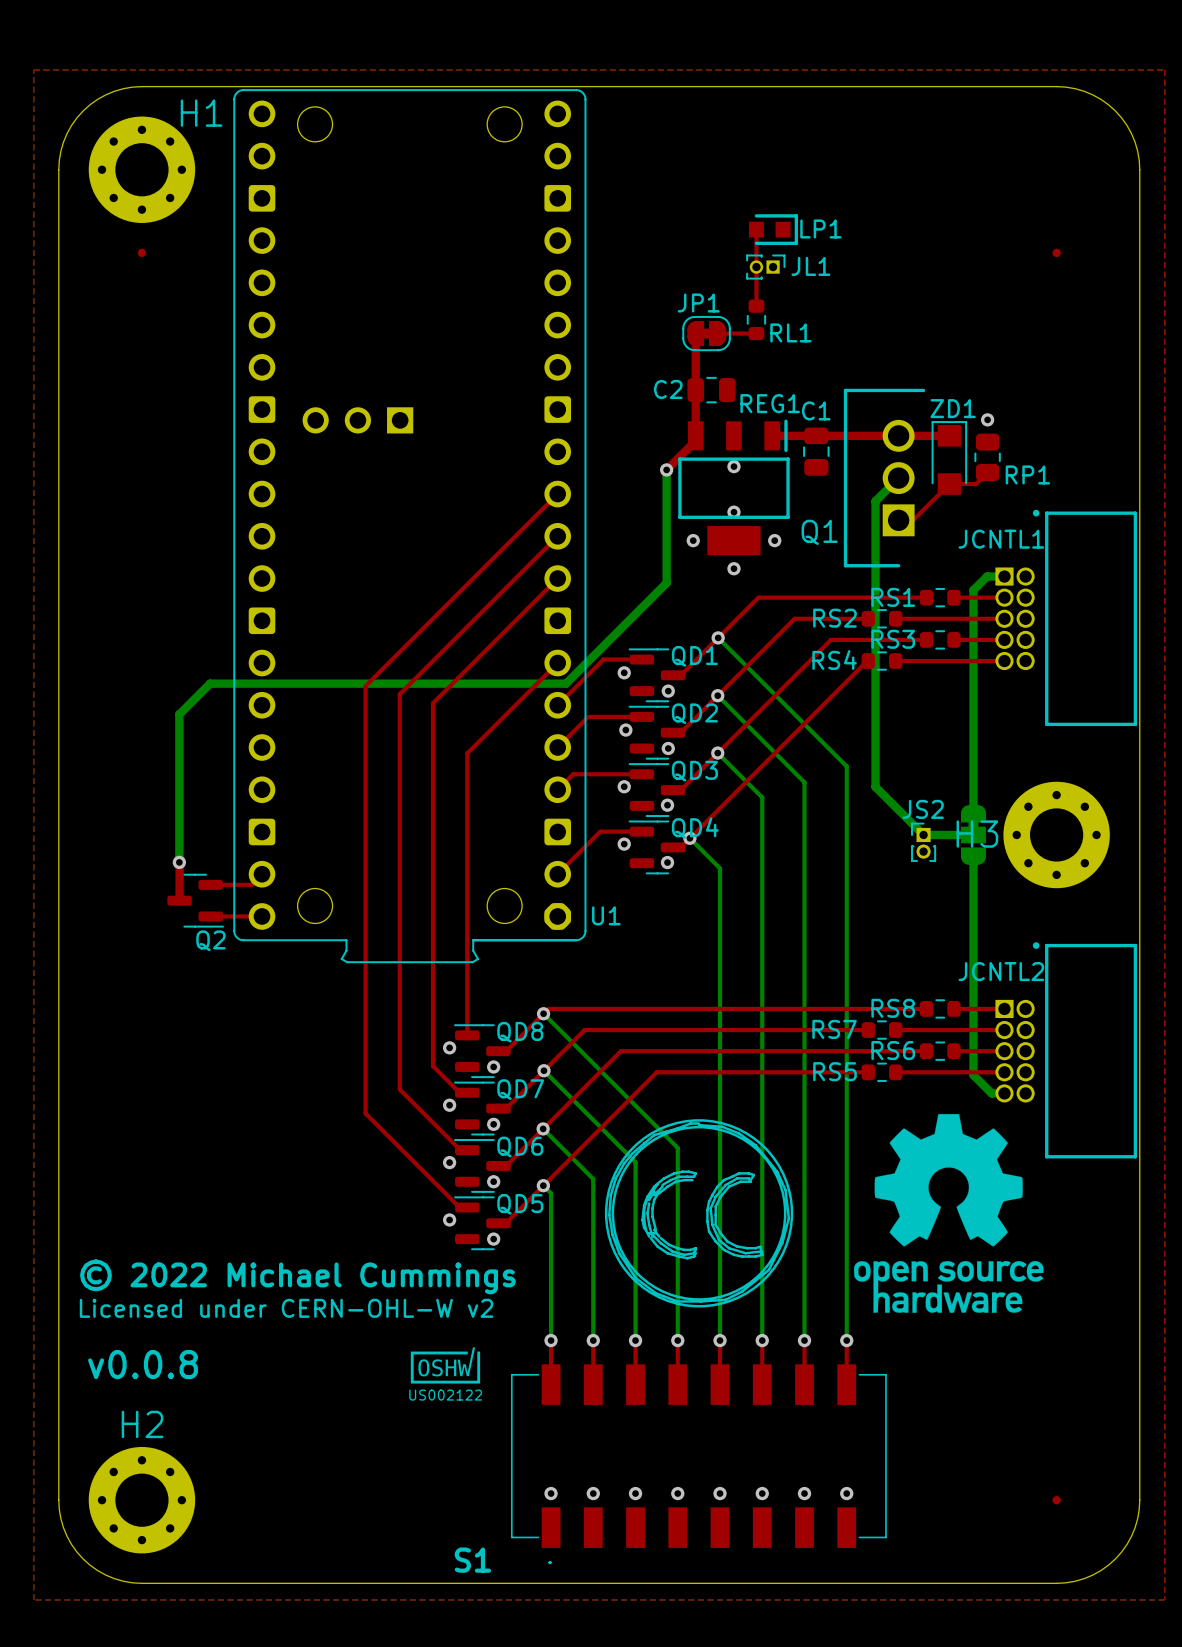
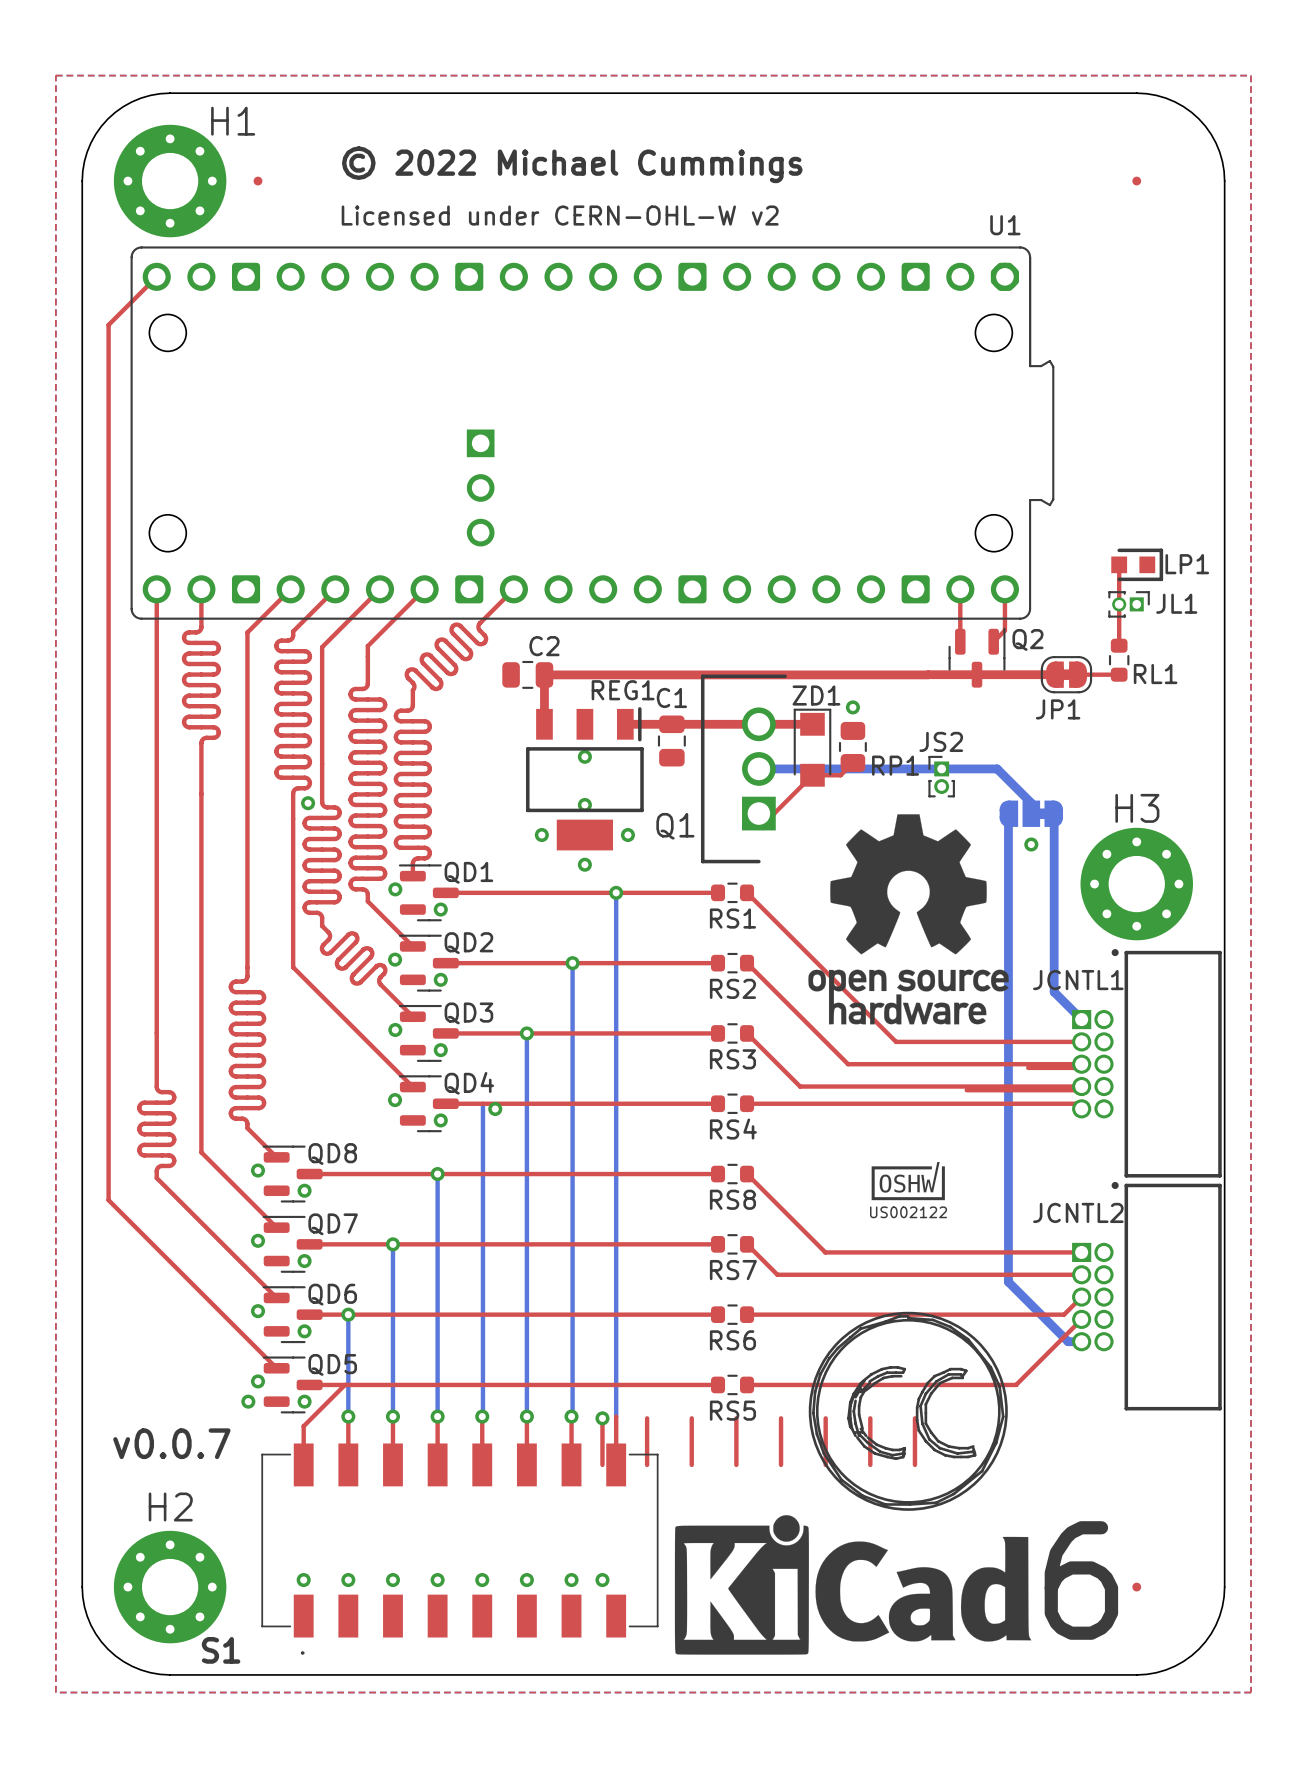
text: none -> © 2022 Michael Cummings (572, 164)
text: none -> Licensed under CERN-OHL-W v2 (560, 215)
top track: (756, 229) (756, 306) -> (1119, 564) (1119, 645)
LP1 position: (773, 229) -> (1137, 564)
part position: (141, 252) -> (257, 181)
part position: (1056, 252) -> (1136, 181)
top track: none -> (156, 276) (108, 324) (108, 1200) (276, 1368)
JL1 position: (765, 267) -> (1129, 604)
JP1 name position: JP1 (698, 303) -> JP1 (1058, 709)
RL1 position: (756, 319) -> (1119, 660)
top track: (695, 333) (695, 435) -> none
JP1 position: (706, 333) -> (1066, 674)
top track: (717, 333) (756, 333) -> (1077, 674) (1119, 674)
C2 name position: C2 (668, 389) -> C2 (544, 646)
C2 position: (711, 390) -> (527, 674)
via: (987, 419) -> none
top track: (772, 435) (949, 435) -> (625, 724) (812, 724)
top track: (695, 440) (666, 469) -> none
C1 position: (816, 451) -> (671, 740)
ZD1 position: (949, 457) -> (812, 747)
RP1 position: (987, 457) -> (852, 746)
via: (733, 466) -> none
bottom track: (666, 469) (666, 583) (566, 683) (210, 683) (179, 714) (179, 862) -> none
via: (666, 469) -> none
top track: (987, 472) (976, 484) (949, 484) (913, 520) (898, 520) -> (852, 763) (840, 775) (812, 775) (774, 813) (758, 813)
Q1 position: (884, 478) -> (743, 768)
bottom track: (898, 478) (875, 501) (875, 786) (923, 834) (973, 834) -> none
REG1 position: (733, 487) -> (584, 778)
top track: (557, 494) (365, 686) (365, 1113) (459, 1207) -> none
via: (733, 512) -> none
U1 rotation: 0° (409, 526) -> 90° counterclockwise (592, 433)
top track: (557, 536) (399, 694) (399, 1089) (460, 1150) -> none
via: (693, 540) -> none
via: (774, 540) -> none
top track: none -> (156, 589) (156, 1086) (159, 1091) (170, 1092) (174, 1097) (169, 1102) (143, 1102) (139, 1107) (143, 1113) (169, 1113) (174, 1118) (169, 1123) (143, 1123) (139, 1129) (143, 1134) (170, 1134) (174, 1139) (169, 1144) (143, 1145) (139, 1150) (143, 1155) (172, 1156) (174, 1160) (172, 1164) (157, 1168) (156, 1178) (276, 1297)
top track: none -> (201, 589) (201, 629) (197, 632) (186, 633) (184, 637) (188, 642) (214, 643) (218, 648) (214, 653) (188, 653) (184, 658) (188, 663) (214, 664) (218, 669) (214, 674) (188, 674) (184, 679) (187, 684) (214, 685) (218, 690) (214, 695) (187, 695) (184, 700) (188, 706) (214, 706) (218, 711) (214, 716) (187, 716) (184, 722) (187, 727) (214, 727) (218, 732) (216, 737) (204, 738) (201, 743) (201, 1152) (276, 1227)
top track: none -> (290, 589) (247, 632) (247, 976) (244, 980) (234, 982) (230, 986) (234, 991) (259, 992) (264, 997) (260, 1002) (235, 1002) (231, 1006) (234, 1012) (259, 1013) (264, 1018) (260, 1023) (235, 1023) (231, 1027) (231, 1031) (234, 1033) (259, 1034) (264, 1039) (260, 1044) (235, 1044) (231, 1047) (231, 1051) (234, 1055) (259, 1055) (264, 1060) (259, 1065) (234, 1066) (230, 1070) (232, 1074) (260, 1076) (264, 1081) (259, 1087) (234, 1087) (231, 1090) (231, 1094) (235, 1097) (260, 1097) (264, 1102) (259, 1108) (234, 1108) (231, 1114) (234, 1118) (245, 1120) (247, 1128) (276, 1157)
top track: none -> (335, 589) (293, 631) (291, 639) (279, 641) (276, 645) (280, 651) (305, 651) (309, 656) (306, 661) (280, 661) (276, 667) (280, 672) (306, 672) (309, 677) (306, 682) (280, 682) (276, 688) (280, 693) (305, 693) (309, 698) (306, 703) (280, 703) (276, 709) (280, 714) (306, 714) (309, 719) (306, 724) (280, 725) (276, 729) (280, 735) (305, 735) (309, 740) (306, 745) (280, 746) (276, 750) (280, 756) (305, 756) (309, 761) (306, 767) (280, 767) (276, 771) (280, 777) (305, 777) (309, 782) (307, 787) (296, 788) (293, 792) (293, 967) (412, 1087)
top track: none -> (379, 589) (322, 647) (322, 802) (325, 806) (337, 808) (339, 813) (335, 817) (308, 818) (304, 823) (309, 828) (335, 828) (339, 834) (335, 838) (308, 839) (304, 844) (309, 849) (335, 849) (339, 855) (335, 860) (308, 860) (304, 866) (309, 870) (335, 870) (339, 876) (335, 881) (308, 881) (304, 887) (309, 891) (335, 891) (339, 897) (335, 902) (308, 902) (304, 908) (307, 912) (320, 914) (322, 926) (329, 933) (329, 938) (322, 947) (323, 952) (330, 952) (348, 934) (355, 934) (356, 940) (337, 960) (337, 966) (344, 967) (363, 949) (369, 949) (371, 955) (352, 975) (352, 980) (359, 983) (376, 966) (382, 965) (385, 970) (379, 978) (379, 983) (412, 1016)
top track: none -> (424, 589) (367, 646) (367, 685) (363, 688) (353, 689) (350, 694) (355, 699) (381, 699) (385, 704) (381, 709) (355, 710) (350, 714) (354, 720) (380, 720) (385, 725) (381, 730) (355, 731) (350, 735) (353, 741) (380, 741) (385, 746) (381, 752) (355, 752) (350, 756) (353, 762) (380, 762) (385, 768) (381, 773) (355, 773) (350, 777) (353, 783) (380, 783) (385, 789) (381, 794) (355, 794) (350, 797) (350, 801) (353, 804) (380, 805) (385, 810) (381, 815) (352, 817) (350, 821) (353, 825) (380, 826) (385, 831) (380, 836) (353, 837) (350, 840) (351, 844) (355, 847) (381, 847) (385, 852) (380, 857) (353, 858) (350, 860) (350, 864) (355, 868) (381, 868) (385, 873) (380, 878) (353, 879) (350, 885) (353, 888) (366, 890) (367, 901) (412, 946)
top track: none -> (513, 589) (479, 624) (478, 629) (485, 637) (483, 643) (477, 643) (459, 625) (452, 627) (452, 633) (470, 651) (468, 658) (462, 657) (444, 640) (437, 641) (437, 648) (455, 666) (454, 672) (447, 672) (429, 654) (422, 656) (422, 662) (440, 681) (439, 687) (432, 687) (414, 669) (410, 669) (407, 672) (407, 677) (414, 686) (412, 706) (408, 710) (397, 711) (396, 718) (400, 721) (425, 721) (429, 726) (425, 731) (400, 731) (395, 736) (399, 742) (425, 742) (429, 746) (425, 752) (400, 752) (395, 757) (399, 763) (425, 763) (429, 768) (425, 773) (400, 774) (395, 778) (399, 784) (425, 784) (429, 789) (425, 794) (400, 795) (395, 799) (399, 805) (425, 805) (429, 809) (429, 813) (425, 815) (400, 816) (396, 820) (396, 824) (399, 826) (425, 826) (429, 830) (429, 834) (425, 837) (400, 837) (396, 840) (396, 844) (399, 847) (425, 847) (429, 851) (427, 857) (416, 858) (413, 860) (412, 876)
top track: none -> (960, 589) (960, 641)
top track: none -> (1004, 589) (1004, 630) (993, 641)
via: (733, 568) -> none
bottom track: (1004, 576) (987, 576) (973, 590) (973, 813) -> none
top track: (557, 578) (432, 703) (432, 1066) (459, 1092) -> none
RS1 name position: RS1 (893, 597) -> RS1 (732, 918)
top track: (926, 597) (758, 597) (680, 675) -> none
RS1 position: (940, 597) -> (732, 892)
top track: (953, 597) (1004, 597) -> none
JCNTL1 position: (1066, 617) -> (1146, 1063)
RS2 name position: RS2 (835, 618) -> RS2 (732, 988)
top track: (868, 618) (794, 618) (680, 732) -> none
RS2 position: (882, 618) -> (732, 963)
top track: (895, 618) (1004, 618) -> none
top track: none -> (928, 674) (1055, 674)
bottom track: (718, 637) (846, 766) (846, 1340) -> none
via: (718, 637) -> none
top track: none -> (928, 674) (544, 674) (544, 724)
RS3 name position: RS3 (893, 639) -> RS3 (732, 1059)
top track: (926, 639) (830, 639) (680, 790) -> none
RS3 position: (940, 639) -> (732, 1033)
top track: (953, 639) (1004, 639) -> none
top track: (641, 659) (603, 659) (557, 705) -> none
RS4 name position: RS4 (834, 660) -> RS4 (733, 1129)
top track: (867, 661) (680, 847) -> none
RS4 position: (882, 661) -> (732, 1103)
top track: (895, 661) (1004, 661) -> none
top track: (557, 663) (467, 753) (467, 1035) -> none
via: none -> (852, 707)
via: (624, 672) -> none
QD1 position: (656, 675) -> (428, 892)
via: (668, 691) -> none
bottom track: (717, 695) (804, 782) (804, 1340) -> none
via: (717, 695) -> none
via: none -> (584, 756)
top track: (641, 716) (588, 716) (557, 747) -> none
bottom track: none -> (758, 768) (997, 768) (1031, 803) (1031, 813)
via: (625, 730) -> none
QD2 position: (656, 732) -> (428, 963)
via: (668, 748) -> none
bottom track: (717, 753) (762, 797) (762, 1340) -> none
via: (717, 753) -> none
via: none -> (308, 803)
via: none -> (584, 804)
bottom track: none -> (1008, 813) (1008, 1282) (1068, 1341) (1081, 1341)
bottom track: none -> (1054, 813) (1054, 992) (1081, 1019)
top track: (641, 774) (573, 774) (557, 789) -> none
via: (624, 786) -> none
via: none -> (541, 835)
via: none -> (627, 835)
QD3 position: (656, 790) -> (428, 1033)
via: none -> (1031, 844)
via: (667, 805) -> none
via: none -> (584, 864)
top track: (641, 831) (600, 831) (557, 874) -> none
part rotation: 0° (973, 834) -> 90° clockwise (1031, 813)
part position: (973, 834) -> (1031, 813)
H3 name position: H3 (977, 834) -> H3 (1137, 808)
bottom track: (689, 838) (720, 868) (720, 1340) -> none
via: (689, 838) -> none
via: none -> (395, 889)
JS2 position: (923, 842) -> (941, 776)
top track: none -> (445, 892) (718, 892)
bottom track: none -> (616, 892) (616, 1416)
via: none -> (616, 892)
top track: none -> (747, 892) (896, 1041) (1081, 1041)
via: (624, 844) -> none
QD4 position: (656, 847) -> (428, 1103)
bottom track: (973, 856) (973, 1075) (991, 1093) (1004, 1093) -> none
via: none -> (440, 909)
top track: (179, 862) (179, 900) -> none
via: (179, 862) -> none
via: (667, 862) -> none
top track: (262, 874) (251, 884) (210, 884) -> none
Q2 rotation: 0° (195, 900) -> 90° counterclockwise (977, 657)
Q2 position: (195, 900) -> (977, 657)
via: none -> (395, 959)
top track: none -> (445, 963) (718, 963)
bottom track: none -> (572, 963) (571, 1416)
via: none -> (572, 963)
top track: none -> (747, 963) (848, 1064) (1081, 1064)
top track: (210, 916) (262, 916) -> none
via: none -> (440, 979)
via: none -> (395, 1029)
top track: none -> (445, 1033) (718, 1033)
bottom track: none -> (526, 1033) (526, 1416)
via: none -> (526, 1033)
top track: none -> (747, 1033) (800, 1086) (1081, 1086)
via: none -> (440, 1050)
RS8 name position: RS8 (893, 1008) -> RS8 (732, 1199)
top track: (926, 1008) (548, 1008) (506, 1051) -> none
RS8 position: (940, 1008) -> (732, 1174)
bottom track: (543, 1013) (677, 1147) (677, 1340) -> none
via: (543, 1013) -> none
RS7 name position: RS7 (834, 1029) -> RS7 (733, 1270)
top track: (868, 1030) (584, 1030) (506, 1108) -> none
RS7 position: (882, 1030) -> (732, 1244)
via: none -> (395, 1100)
top track: none -> (445, 1103) (718, 1103)
bottom track: none -> (482, 1103) (482, 1416)
top track: none -> (747, 1103) (1076, 1103) (1081, 1108)
RS6 name position: RS6 (893, 1050) -> RS6 (732, 1340)
JCNTL2 position: (1066, 1050) -> (1146, 1296)
QD8 position: (482, 1051) -> (292, 1174)
top track: (926, 1051) (620, 1051) (506, 1165) -> none
RS6 position: (940, 1051) -> (732, 1314)
top track: (953, 1051) (1004, 1051) -> none
via: none -> (440, 1120)
via: (493, 1066) -> none
bottom track: (543, 1070) (635, 1162) (635, 1340) -> none
via: (543, 1070) -> none
RS5 name position: RS5 (835, 1071) -> RS5 (732, 1410)
top track: (868, 1072) (656, 1072) (505, 1223) -> none
RS5 position: (882, 1072) -> (732, 1384)
top track: (895, 1072) (1004, 1072) -> none
drawing: none -> [871, 1162, 945, 1201]
via: (449, 1105) -> none
via: none -> (257, 1170)
QD7 position: (482, 1108) -> (292, 1244)
top track: none -> (309, 1174) (718, 1174)
bottom track: none -> (437, 1174) (437, 1416)
via: none -> (437, 1174)
top track: none -> (747, 1174) (825, 1252) (1081, 1252)
via: (493, 1124) -> none
via: none -> (304, 1190)
bottom track: (543, 1128) (593, 1179) (593, 1340) -> none
via: (543, 1128) -> none
via: (449, 1162) -> none
QD6 position: (482, 1165) -> (292, 1314)
via: none -> (257, 1240)
top track: none -> (309, 1244) (718, 1244)
bottom track: none -> (392, 1244) (392, 1416)
via: none -> (392, 1244)
top track: none -> (747, 1244) (777, 1274) (1081, 1274)
via: (493, 1181) -> none
bottom track: (543, 1185) (551, 1193) (551, 1340) -> none
via: (543, 1185) -> none
via: none -> (304, 1261)
drawing position: (699, 1213) -> (908, 1411)
drawing position: (948, 1213) -> (908, 919)
via: (449, 1219) -> none
QD5 position: (482, 1223) -> (292, 1384)
top track: none -> (1081, 1297) (1064, 1314) (747, 1314)
via: none -> (257, 1311)
via: (493, 1239) -> none
top track: none -> (309, 1314) (718, 1314)
bottom track: none -> (348, 1314) (348, 1416)
via: none -> (348, 1314)
top track: none -> (1081, 1319) (1016, 1384) (747, 1384)
via: none -> (304, 1331)
text: © 2022 Michael Cummings (297, 1276) -> none
via: none -> (257, 1381)
top track: none -> (309, 1384) (718, 1384)
text: Licensed under CERN-OHL-W v2 (286, 1308) -> none
top track: none -> (344, 1384) (303, 1426) (303, 1464)
via: none -> (248, 1401)
via: none -> (304, 1401)
top track: none -> (348, 1416) (348, 1464)
via: none -> (348, 1416)
top track: none -> (392, 1416) (392, 1464)
via: none -> (392, 1416)
top track: none -> (437, 1416) (437, 1464)
via: none -> (437, 1416)
top track: none -> (482, 1416) (482, 1464)
via: none -> (482, 1416)
top track: none -> (526, 1416) (526, 1464)
via: none -> (526, 1416)
top track: none -> (571, 1416) (571, 1464)
via: none -> (571, 1416)
top track: none -> (616, 1416) (616, 1464)
via: (593, 1340) -> none
via: (635, 1340) -> none
via: (677, 1340) -> none
via: (720, 1340) -> none
via: (762, 1340) -> none
via: (804, 1340) -> none
via: (846, 1340) -> none
drawing: [410, 1347, 481, 1384] -> none
text: v0.0.8 (143, 1364) -> v0.0.7 (171, 1443)
drawing: none -> [674, 1515, 1032, 1655]
S1 position: (698, 1464) -> (459, 1549)
via: none -> (303, 1580)
via: none -> (348, 1580)
via: none -> (392, 1580)
via: none -> (437, 1580)
via: none -> (482, 1580)
via: none -> (526, 1580)
via: none -> (571, 1580)
via: (593, 1493) -> none
via: (635, 1493) -> none
via: (677, 1493) -> none
via: (720, 1493) -> none
via: (762, 1493) -> none
via: (804, 1493) -> none
via: (846, 1493) -> none
text: none -> 6 (1081, 1580)

